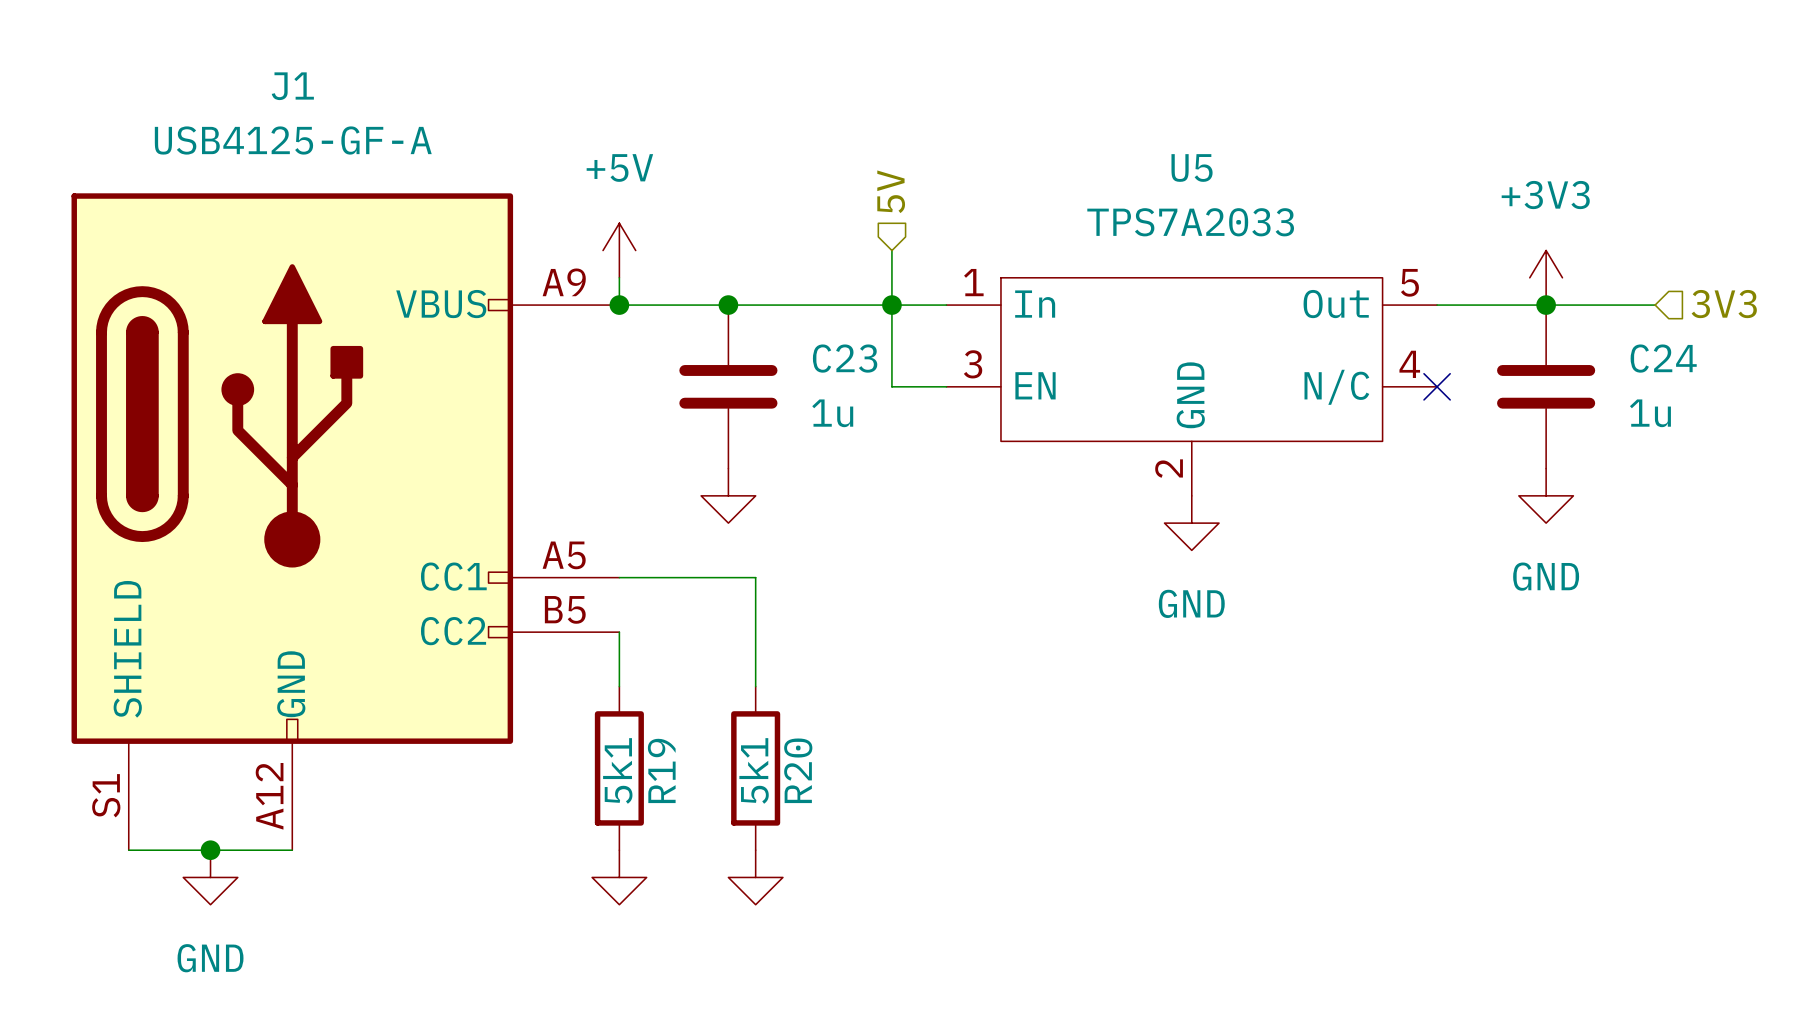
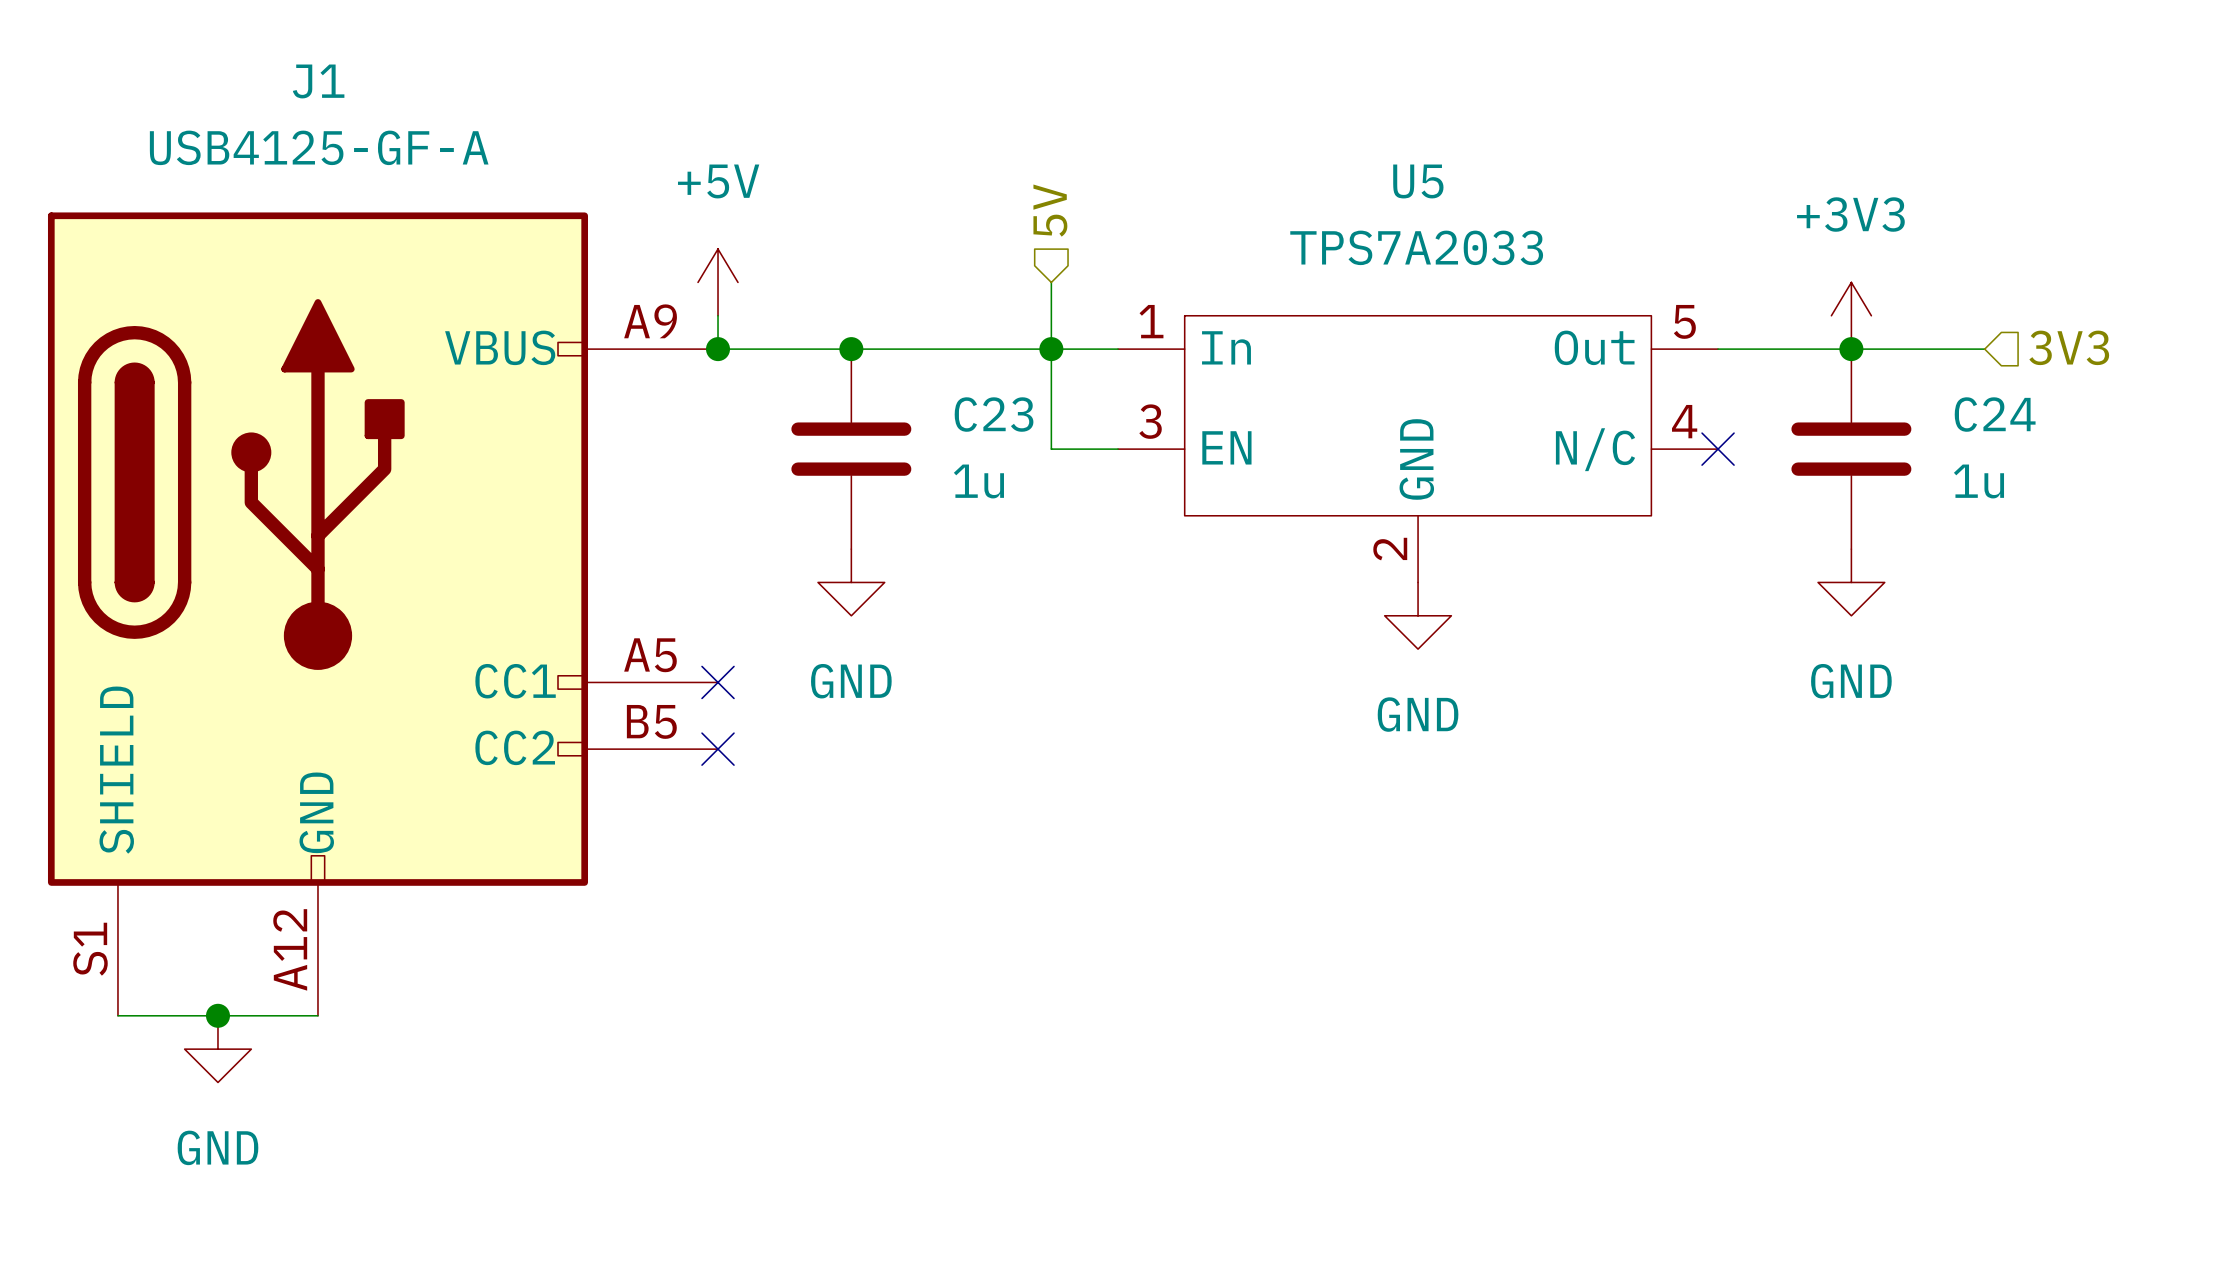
power symbol text: none -> GND (851, 681)
wire: (619, 577) (755, 577) (755, 686) -> none
no-connect mark: none -> (718, 682)
wire: (619, 632) (619, 686) -> none
no-connect mark: none -> (718, 749)
R19: 5k1 (619, 768) -> none
R20: 5k1 (755, 768) -> none
power symbol: (619, 877) -> none
power symbol: (755, 877) -> none

